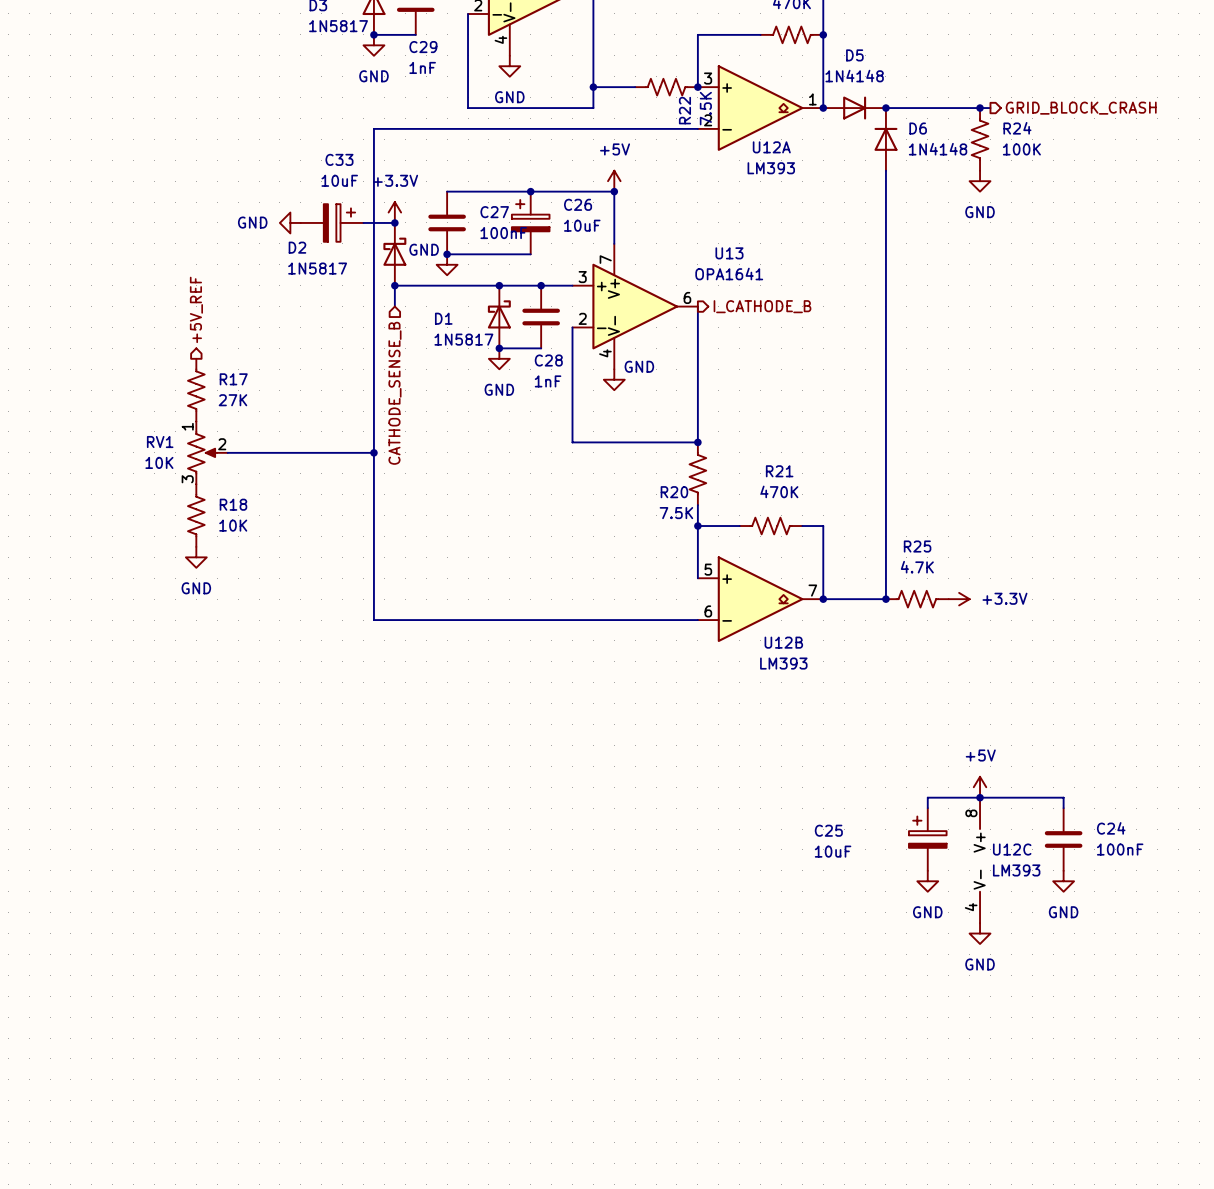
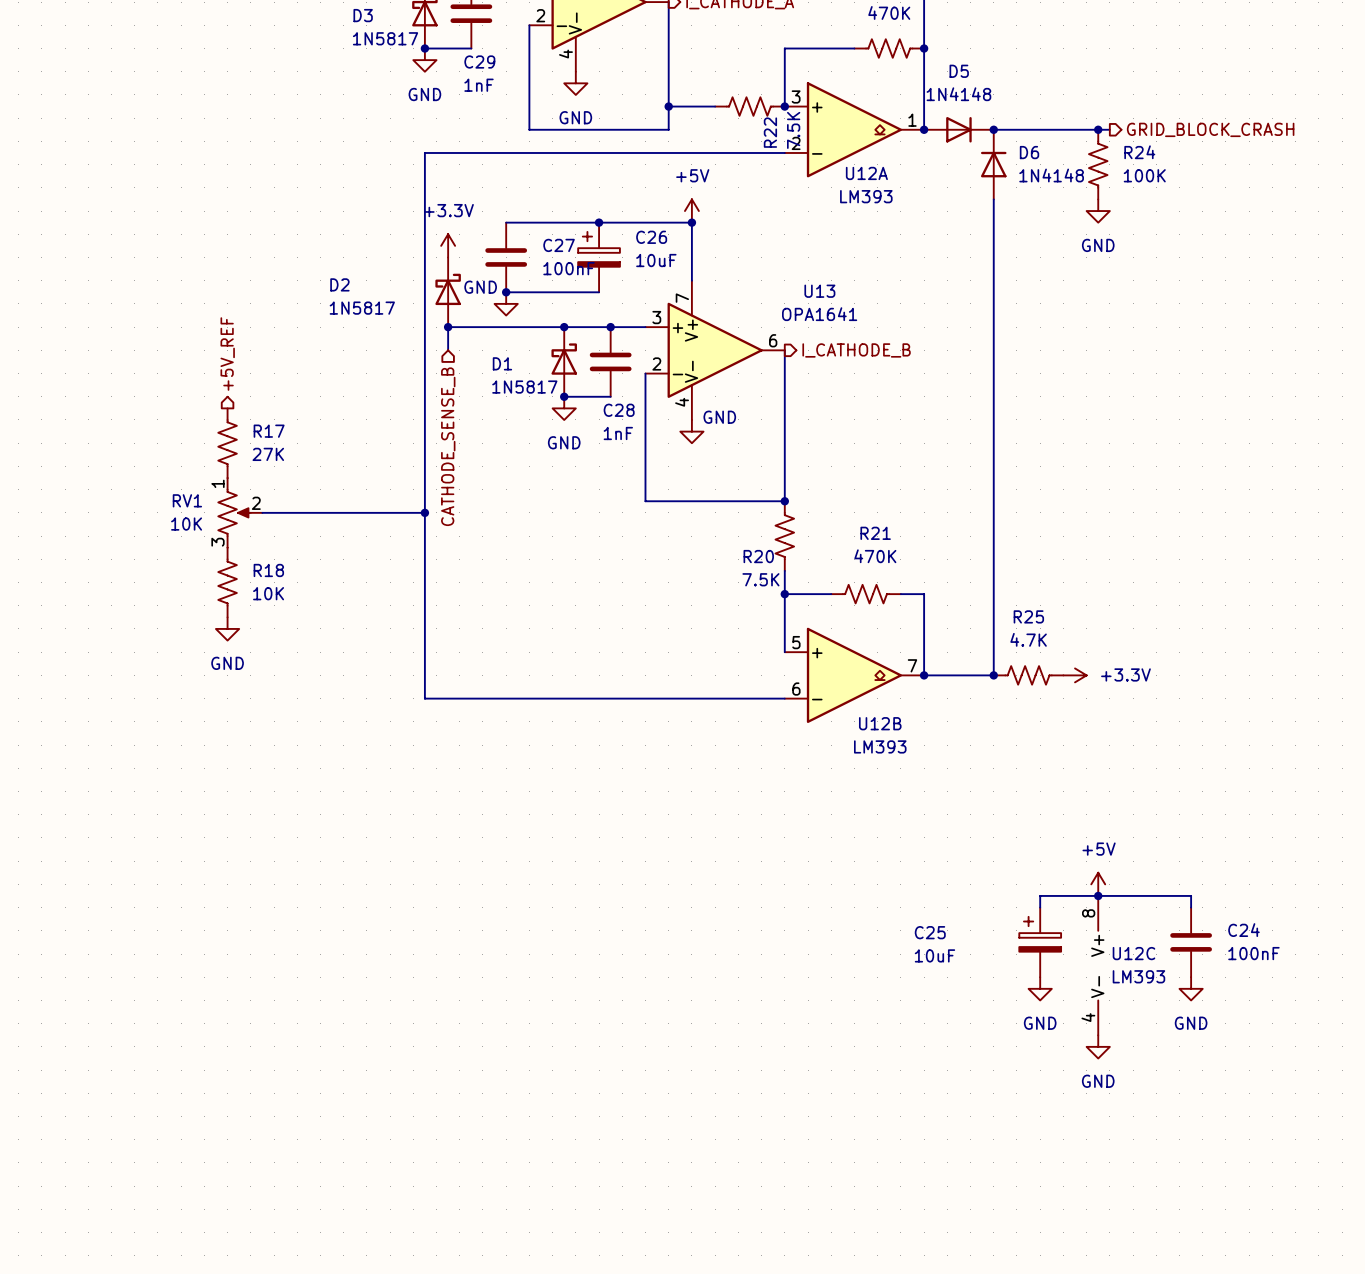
power symbol: GND (290, 222) -> none
C33: 10uF (332, 222) -> none
wire: (363, 222) (394, 222) -> none
junction: (394, 222) -> none

